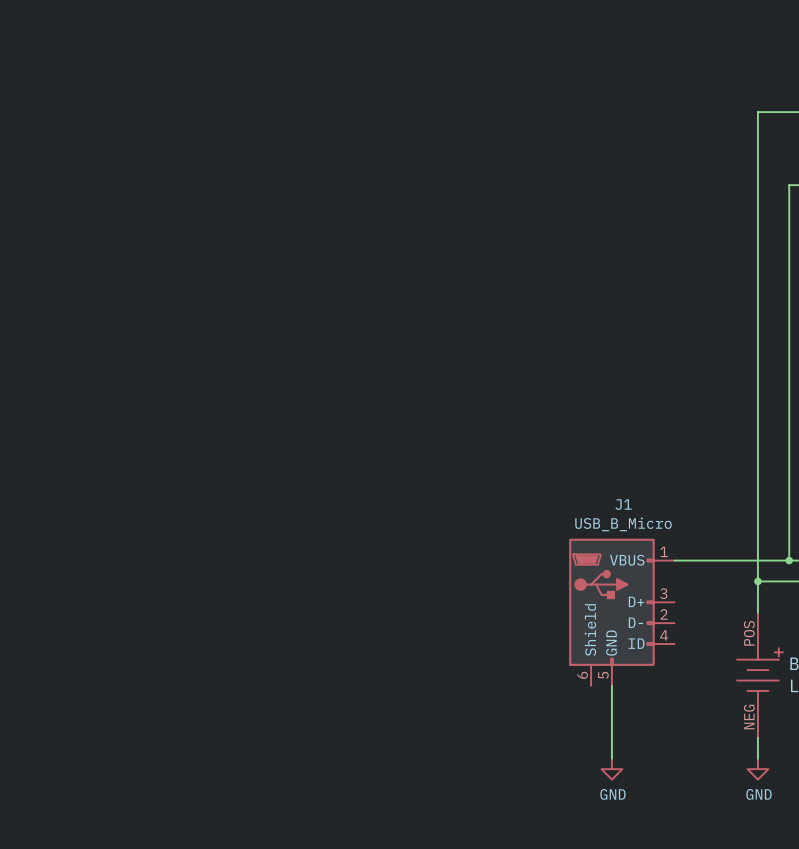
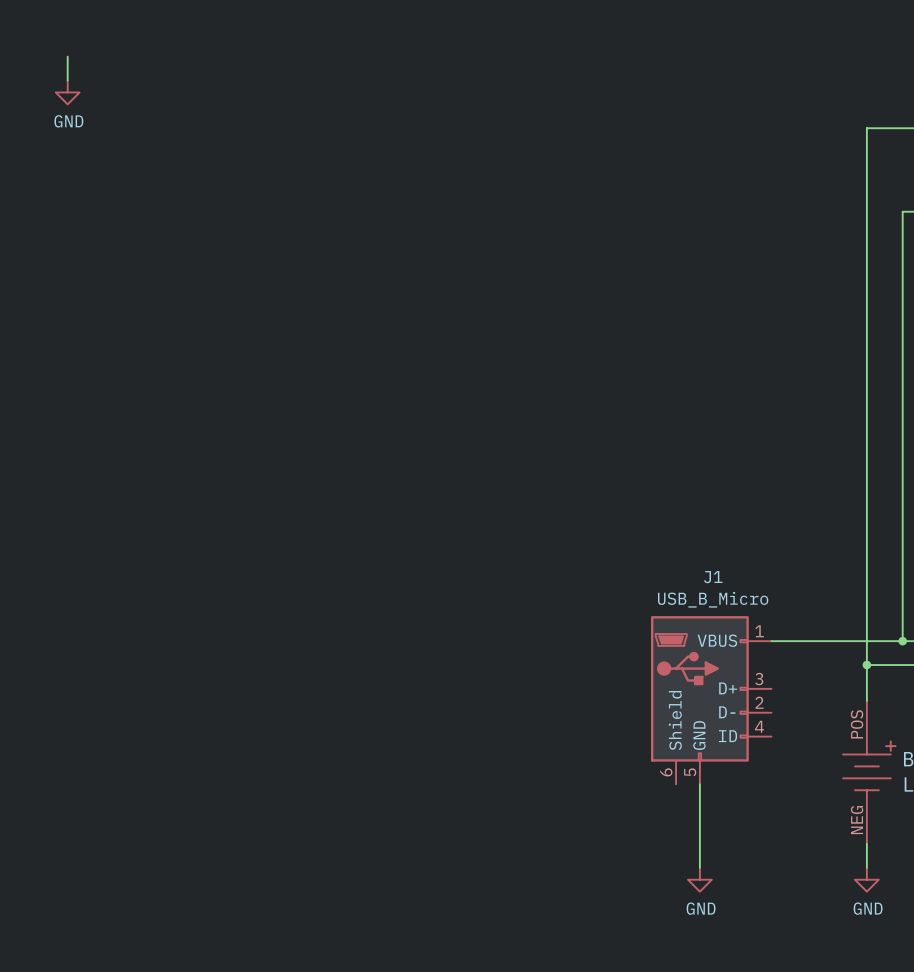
wire: none -> (67, 56) (67, 80)
power symbol: none -> GND (67, 92)

